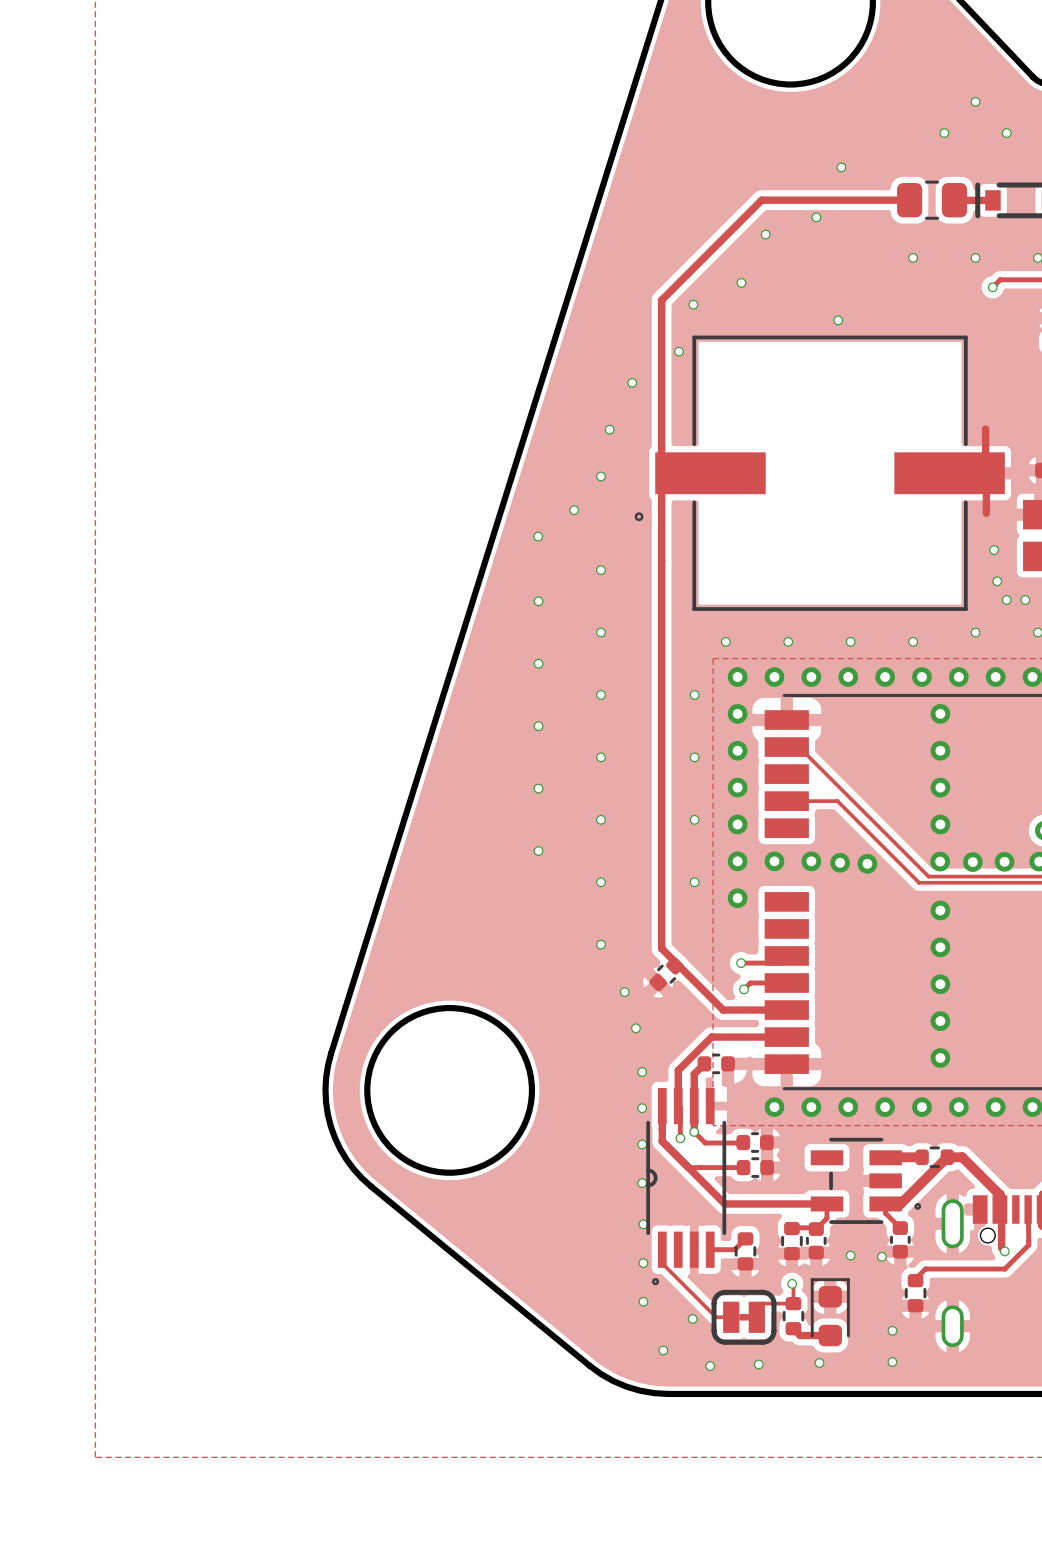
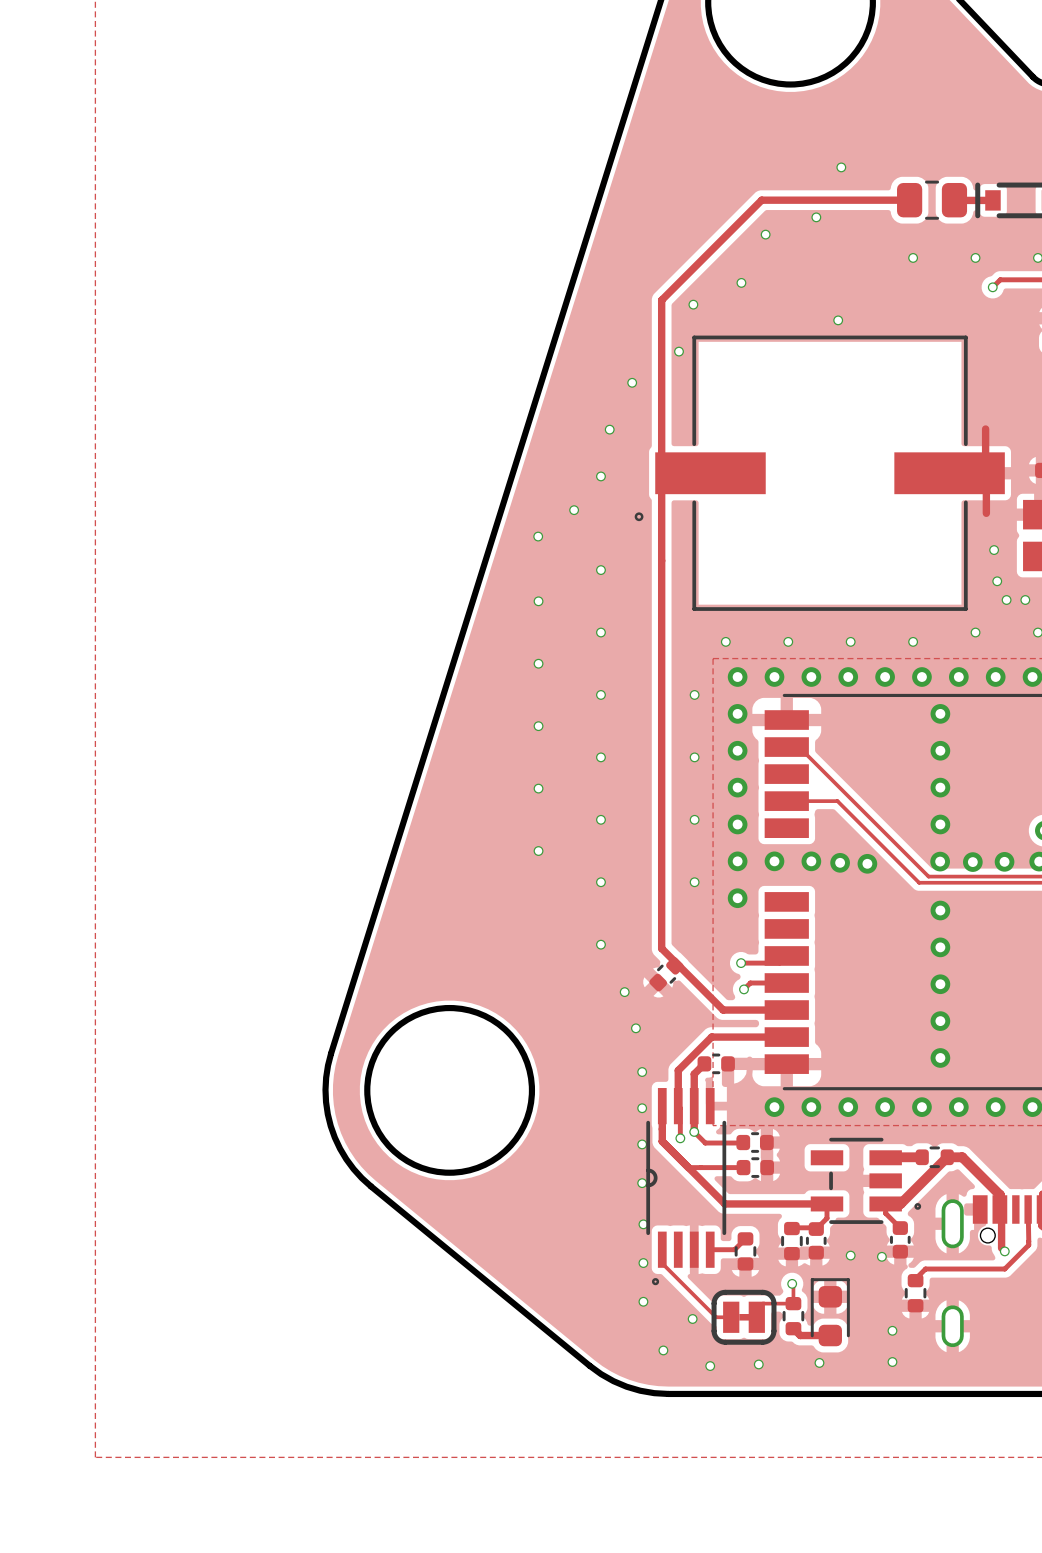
via: (975, 101) -> none
via: (944, 133) -> none
via: (1006, 133) -> none

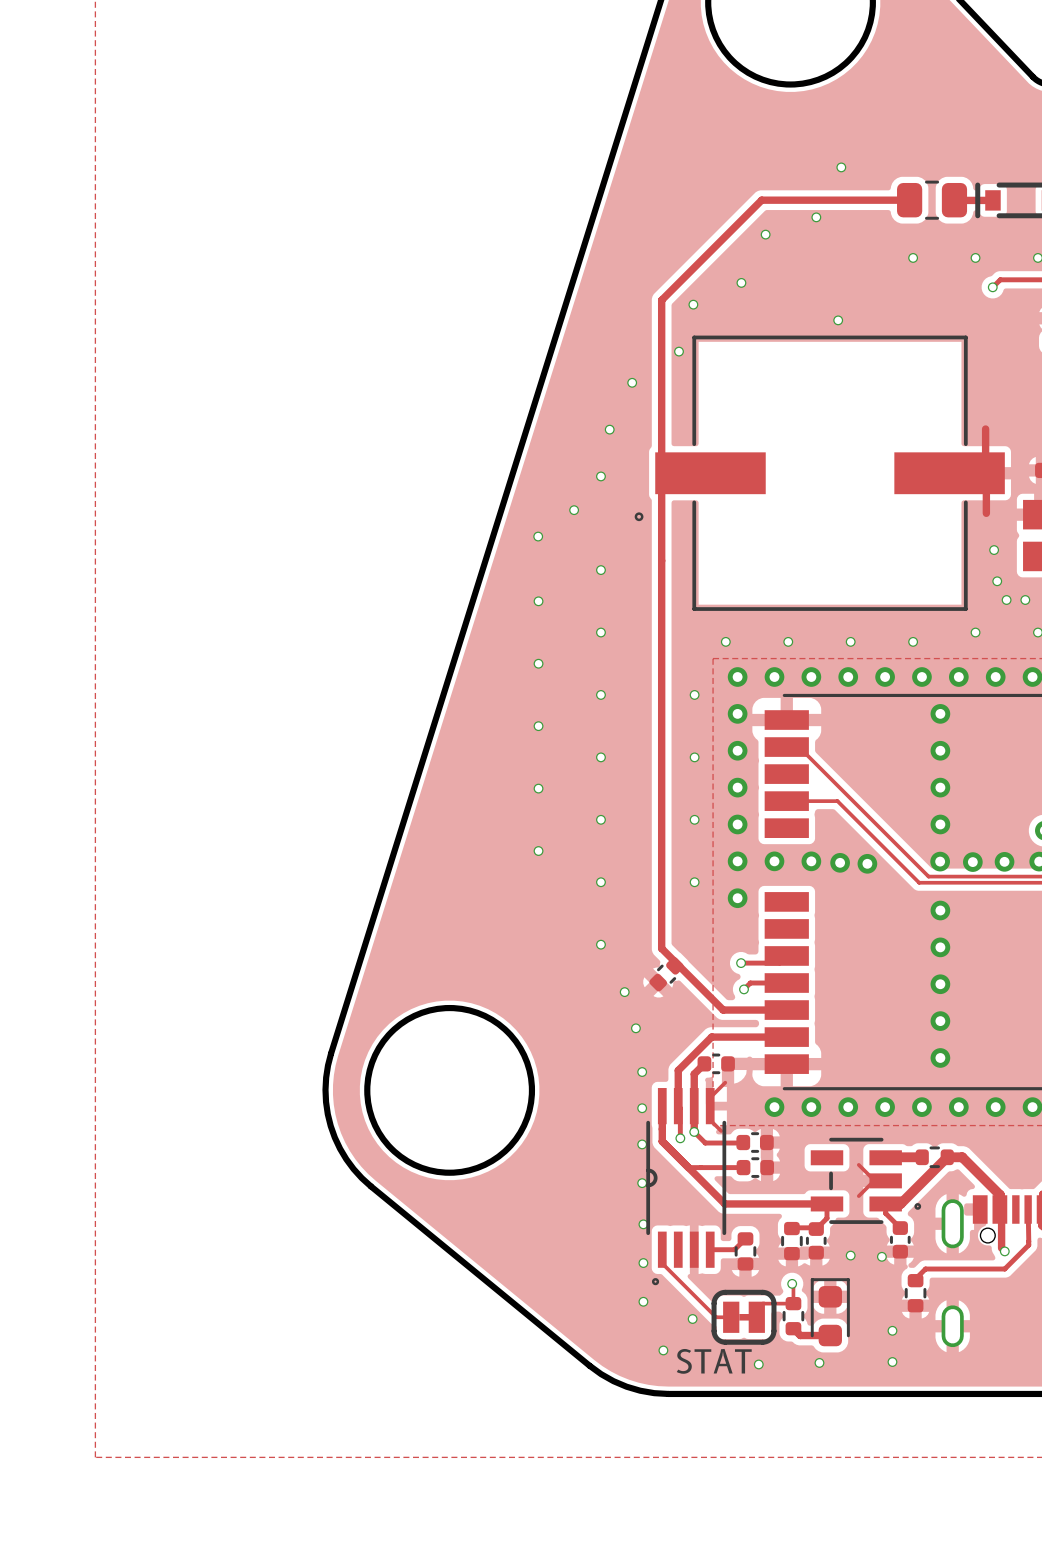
track: none -> (725, 1082) (710, 1097) (710, 1120) (721, 1130)
track: none -> (858, 1164) (874, 1180)
track: none -> (885, 1180) (874, 1180) (858, 1196)
text: none -> STAT (714, 1361)
via: (710, 1366) -> none

